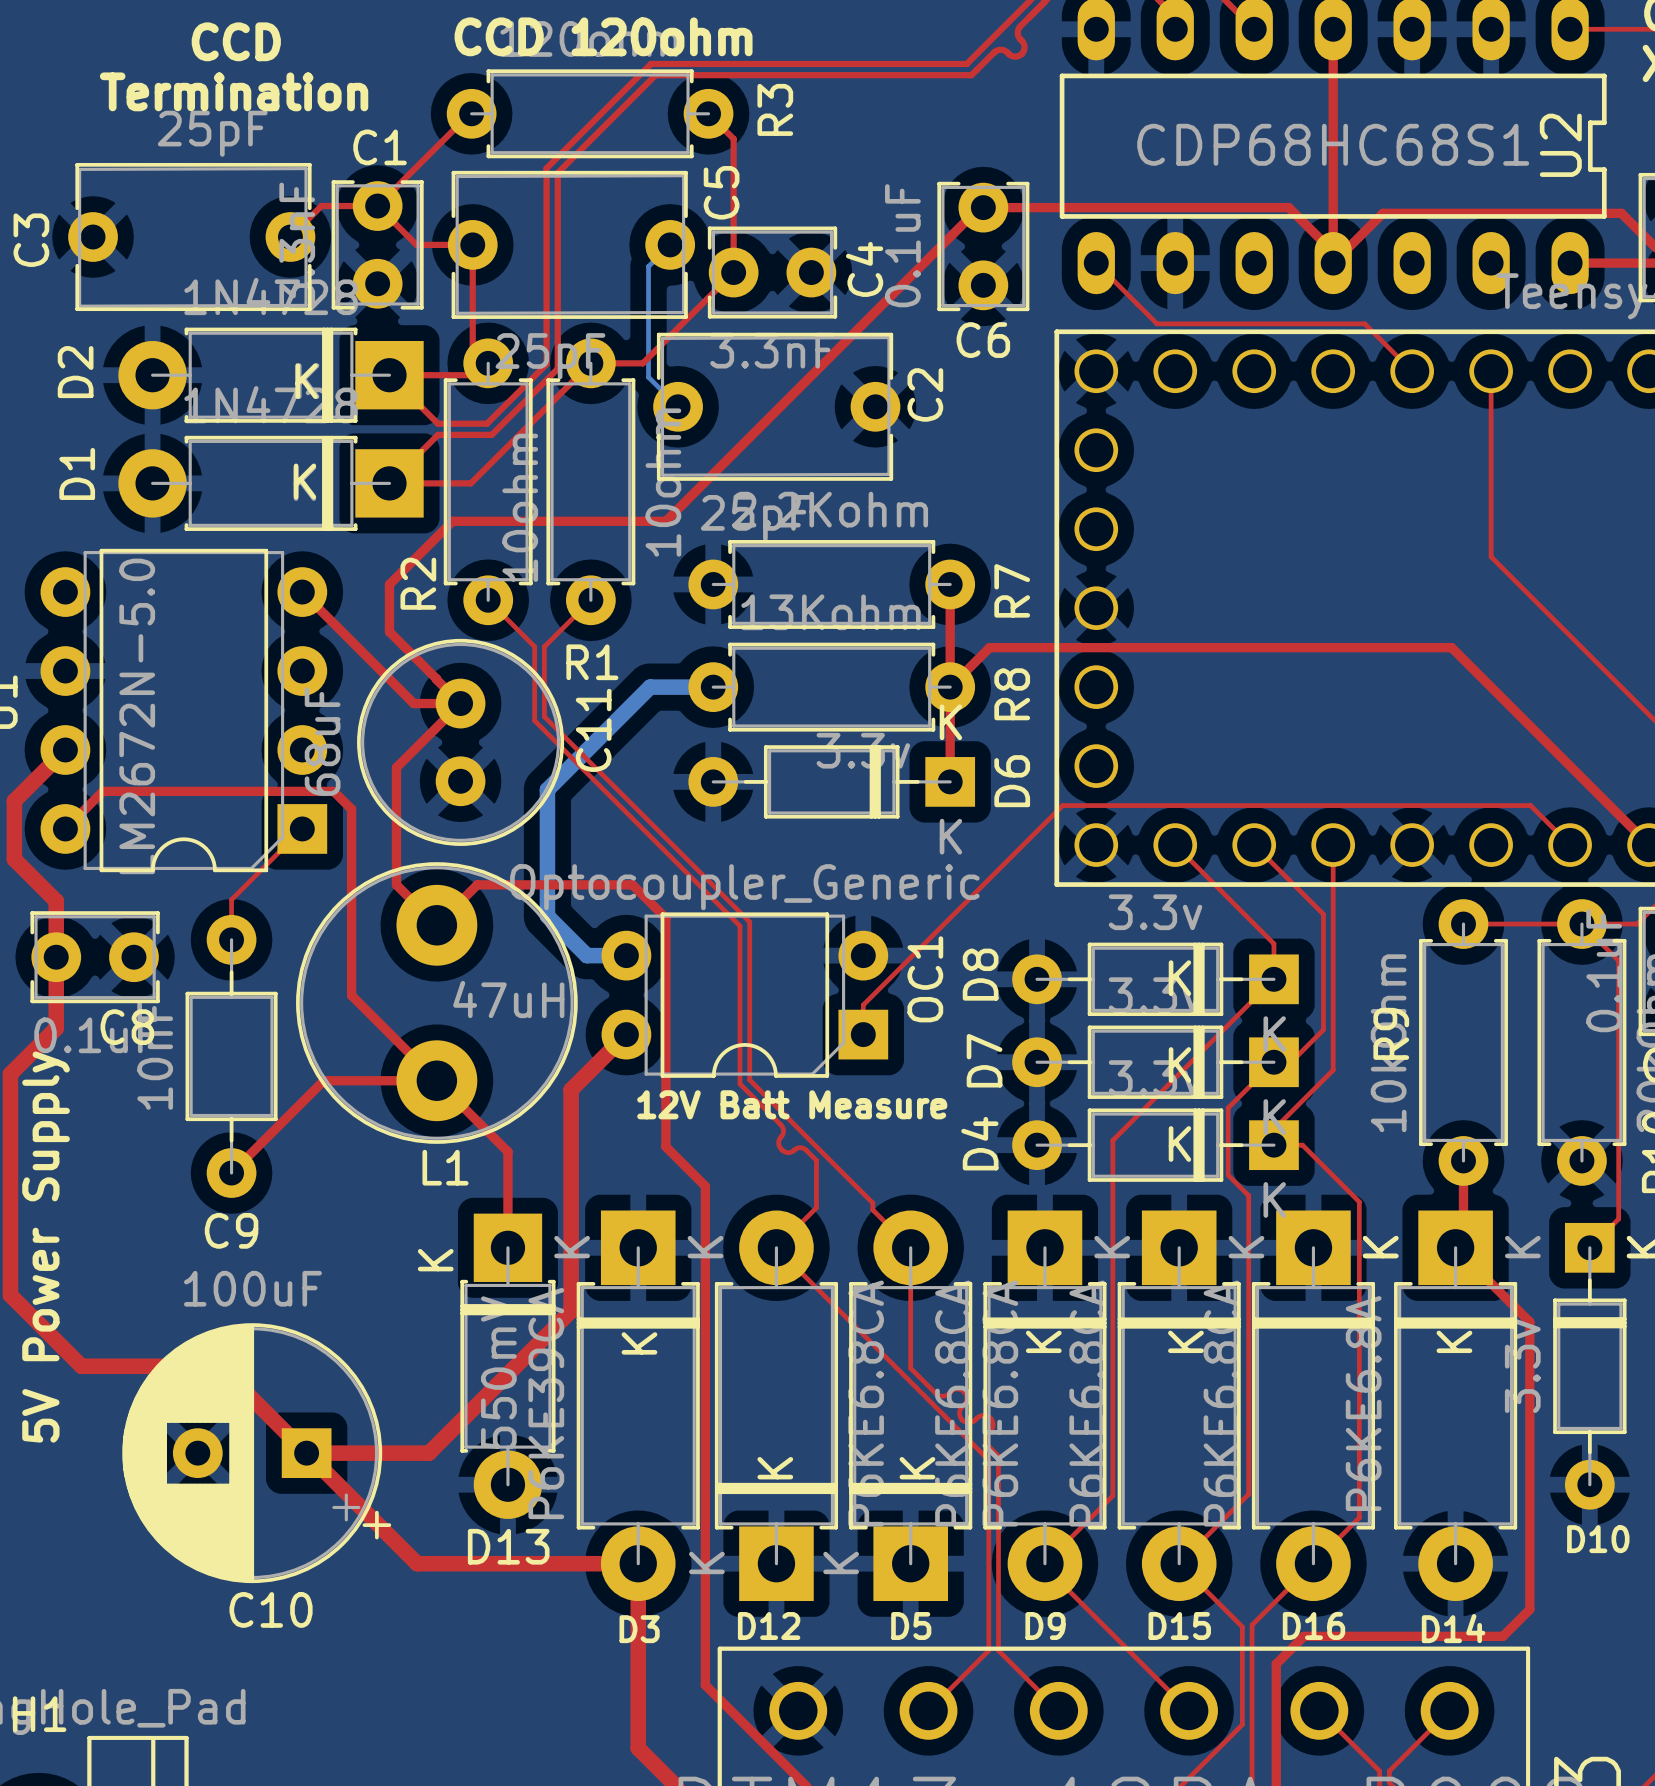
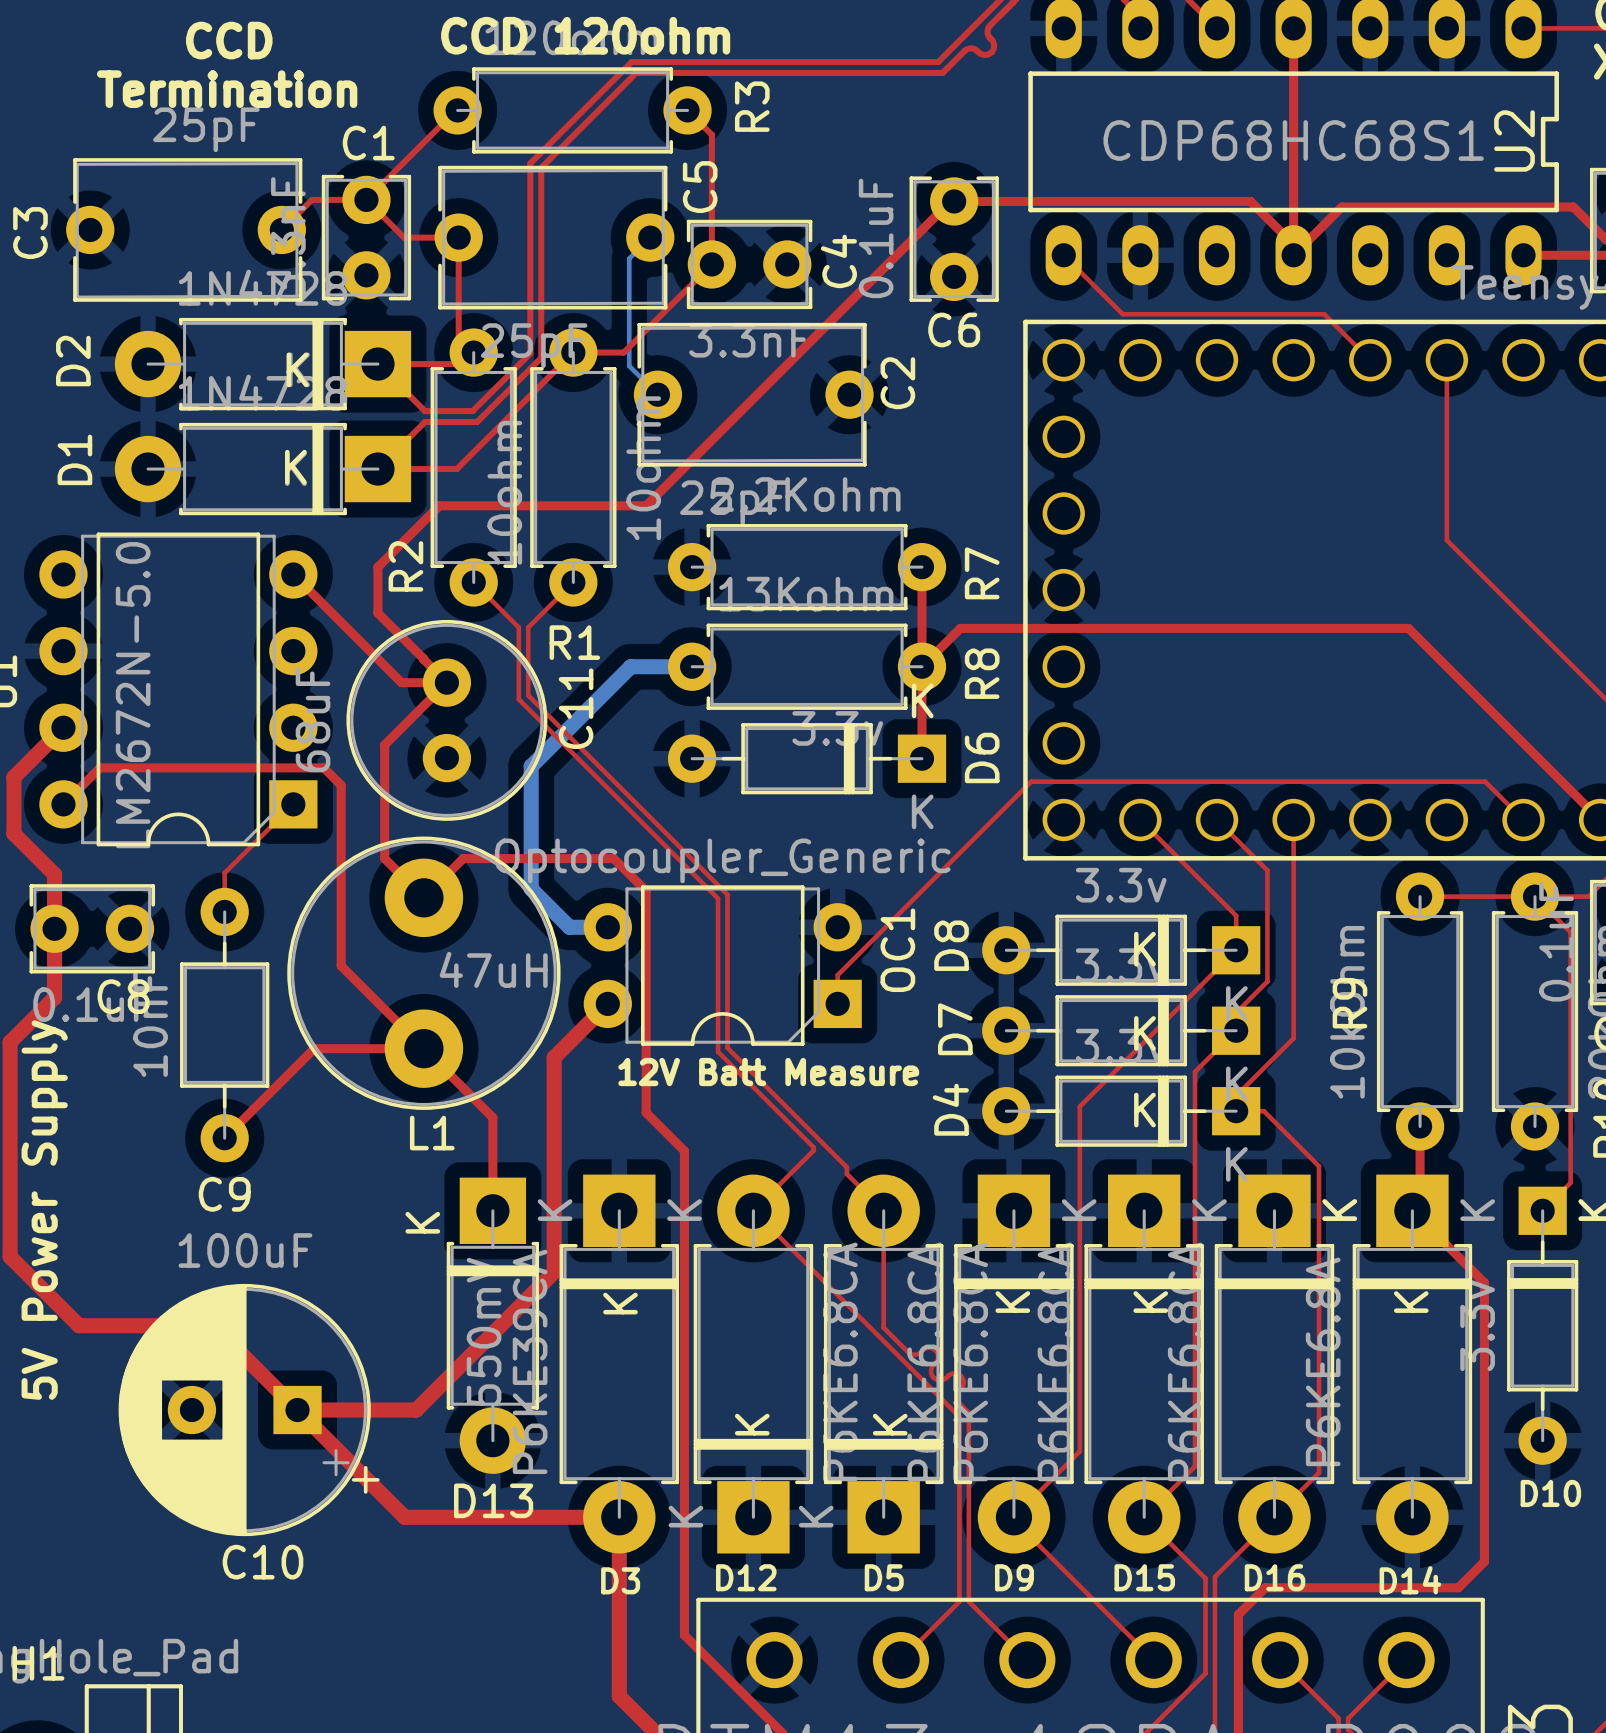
top track: (1306, 897) (1323, 914) (1323, 1029) (1291, 1062) (1273, 1062) -> (1267, 870) (1267, 981) (1237, 1011)
top track: (1231, 1104) (1228, 1108) (1228, 1175) (1248, 1195) (1248, 1494) (1231, 1511) -> (1195, 1071) (1195, 1466)
top track: (781, 1125) (783, 1131) (778, 1142) (781, 1148) (788, 1152) (799, 1147) (806, 1150) -> (757, 1091) (782, 1116)
top track: (816, 1160) (816, 1207) -> (792, 1126) (813, 1147) (813, 1150) (792, 1171)

